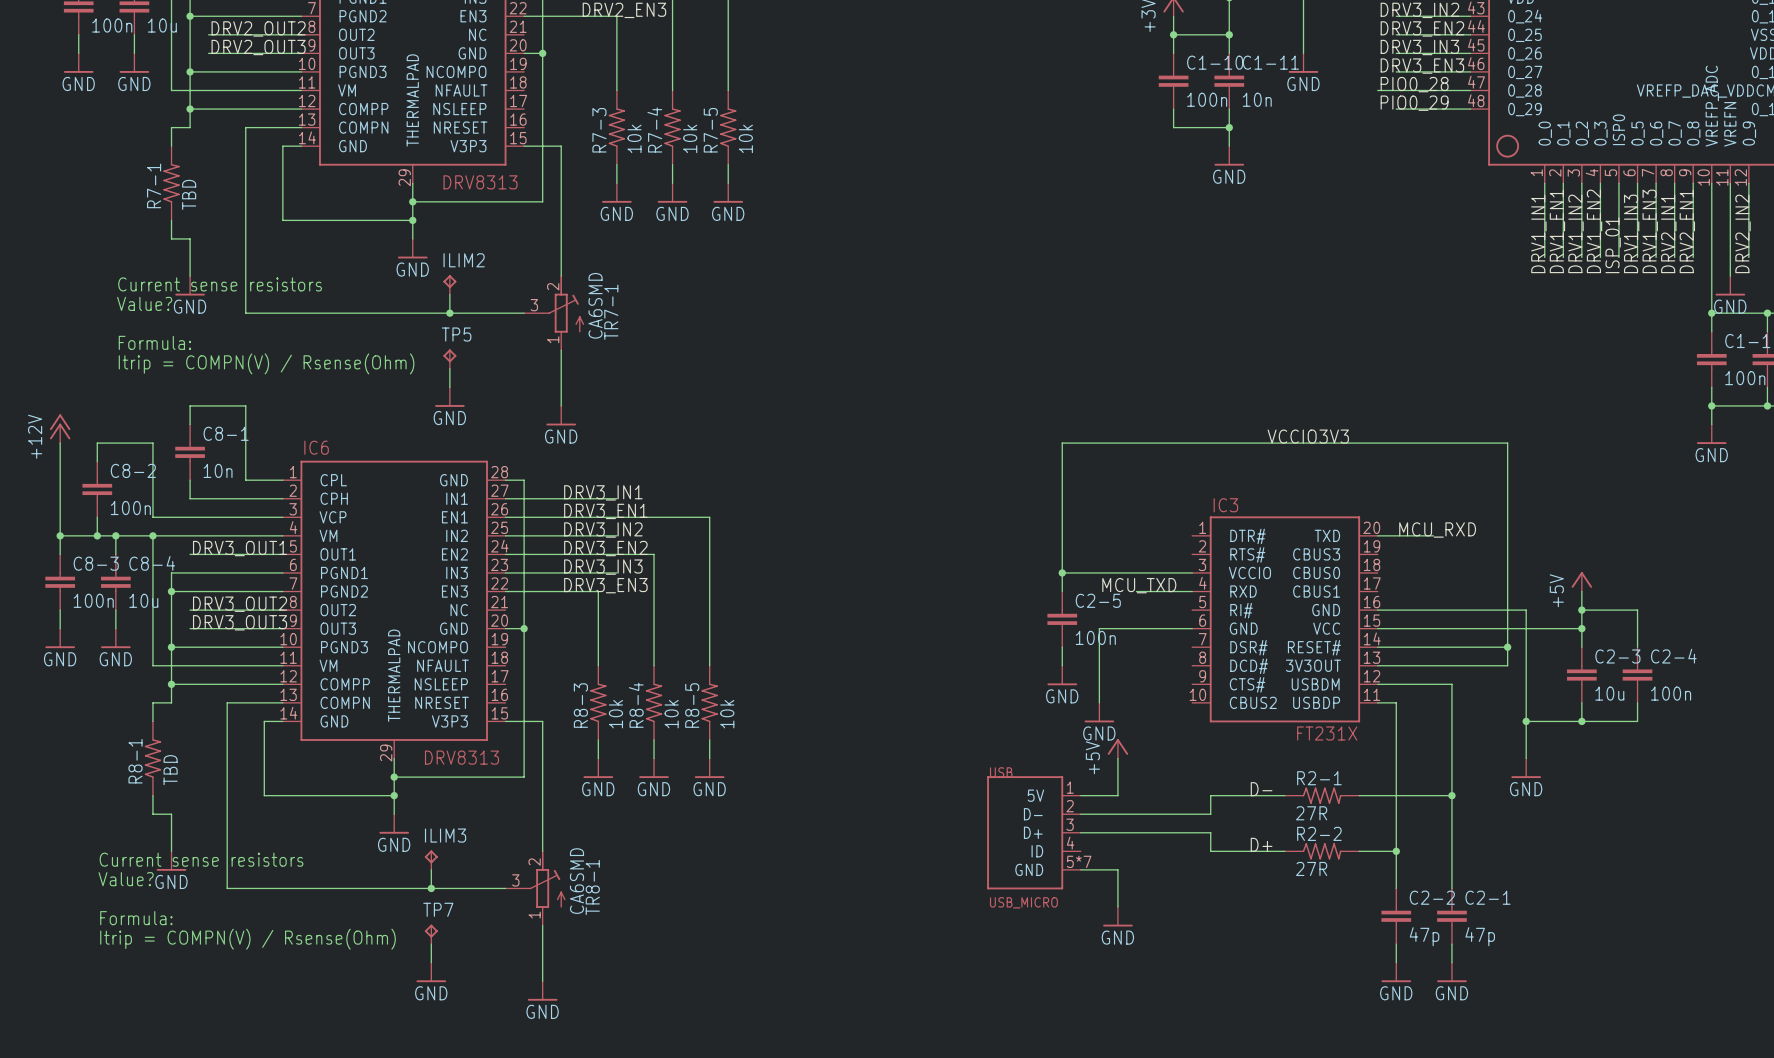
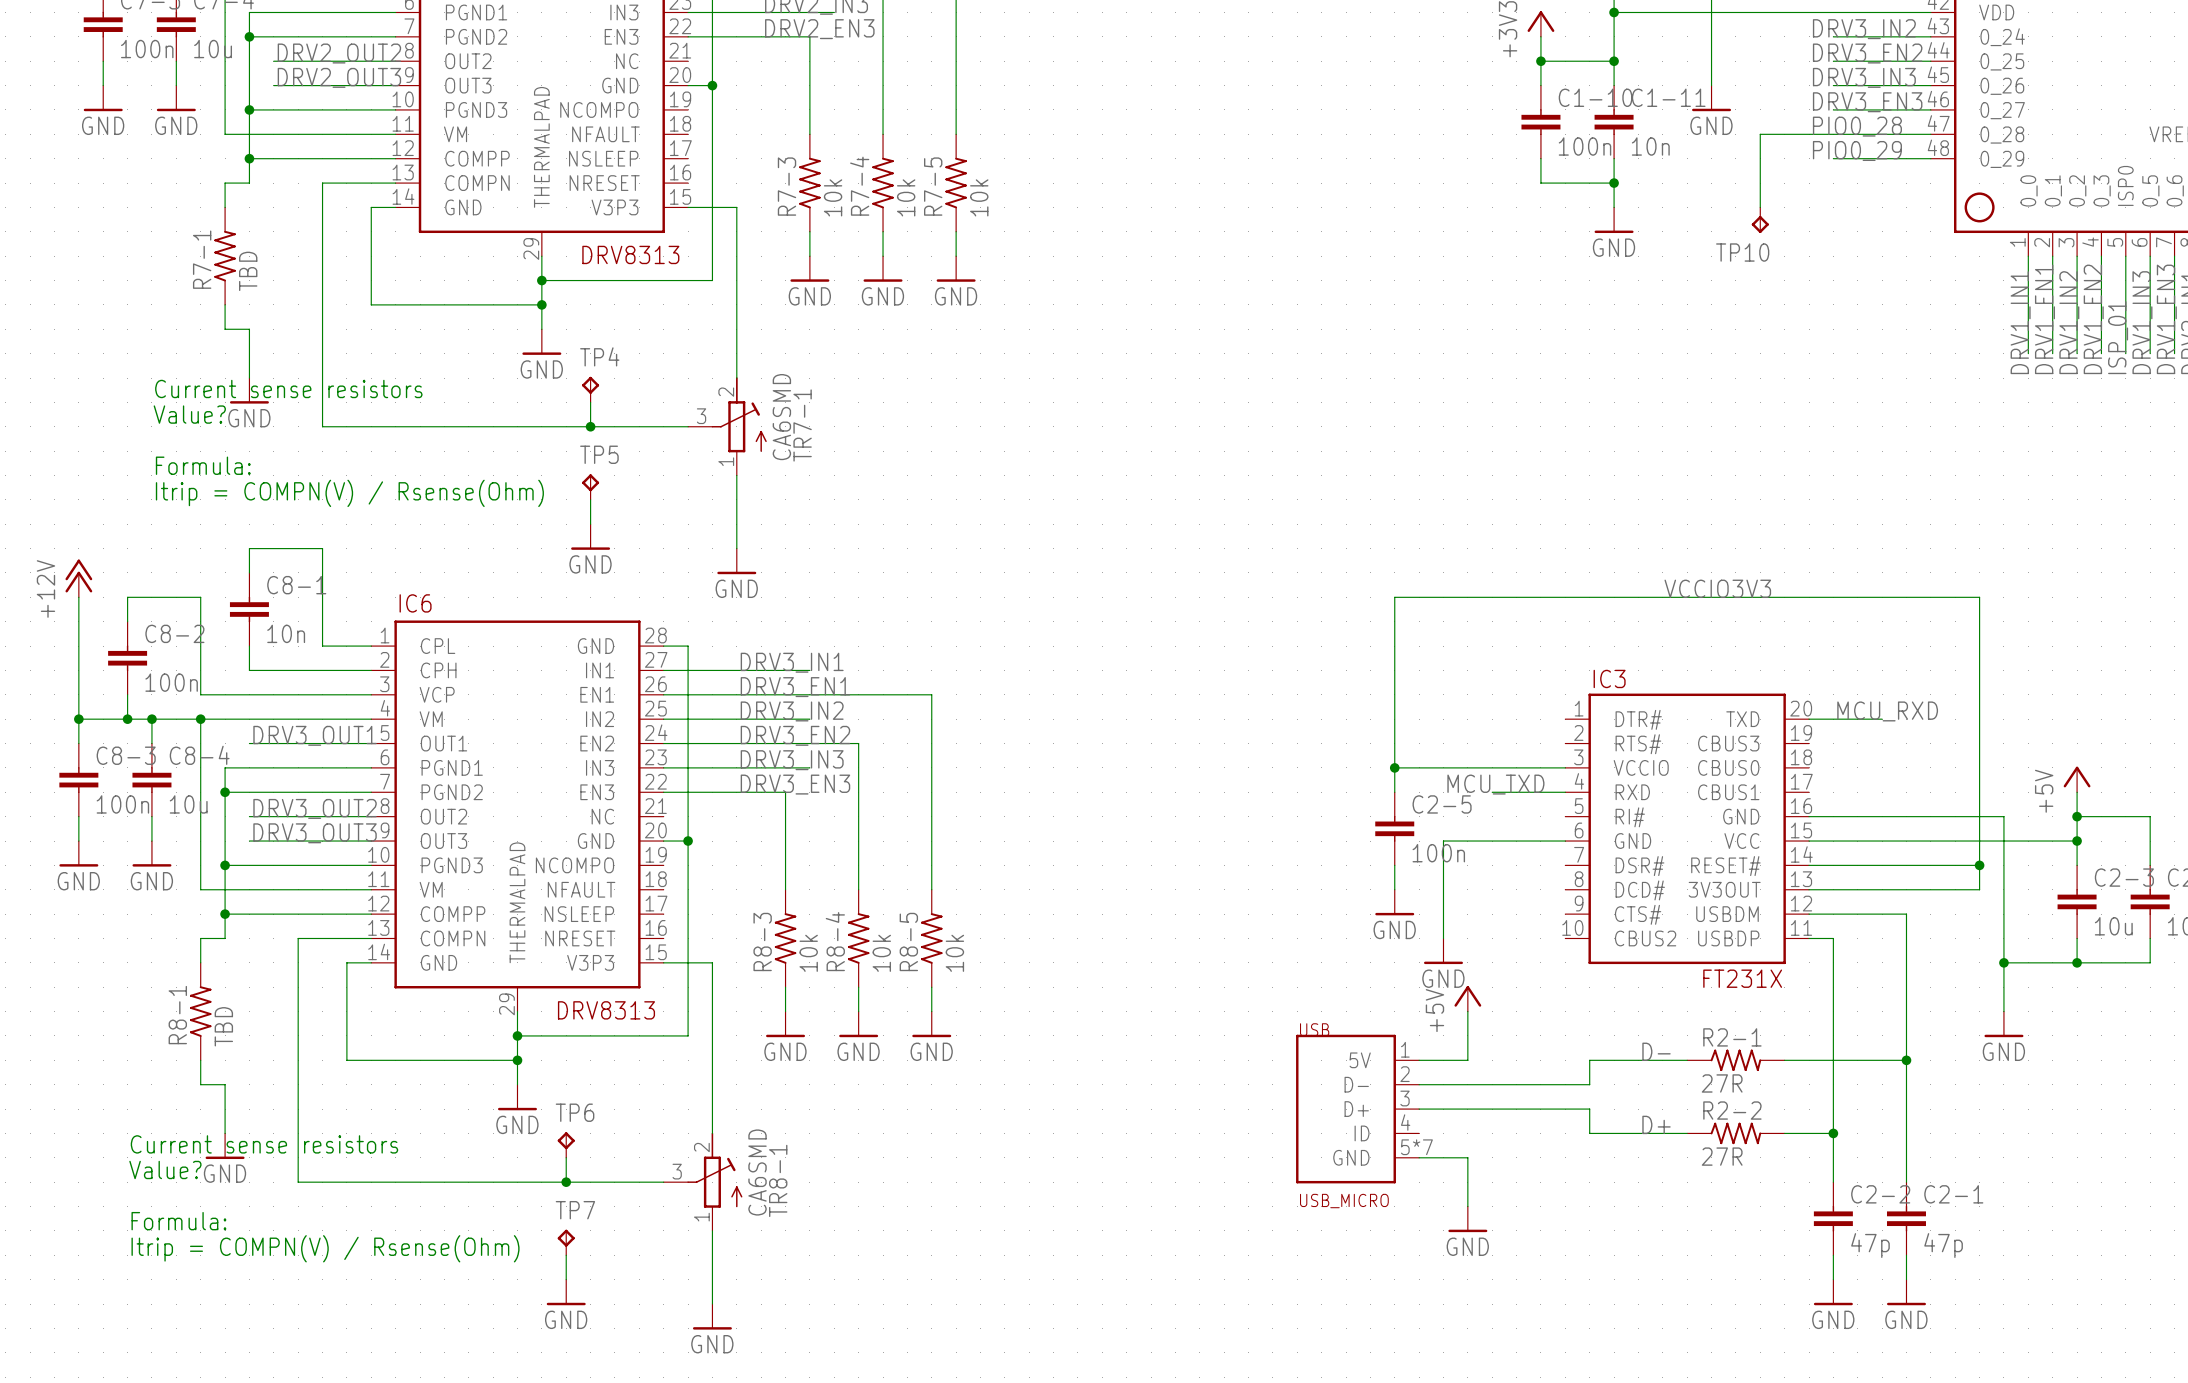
wire: none -> (1809, 134) (1760, 134) (1760, 207)
TP10: none -> (1760, 220)
ILIM2 name: ILIM2 (464, 260) -> TP4 (599, 356)
ILIM3 name: ILIM3 (445, 835) -> TP6 (575, 1112)

